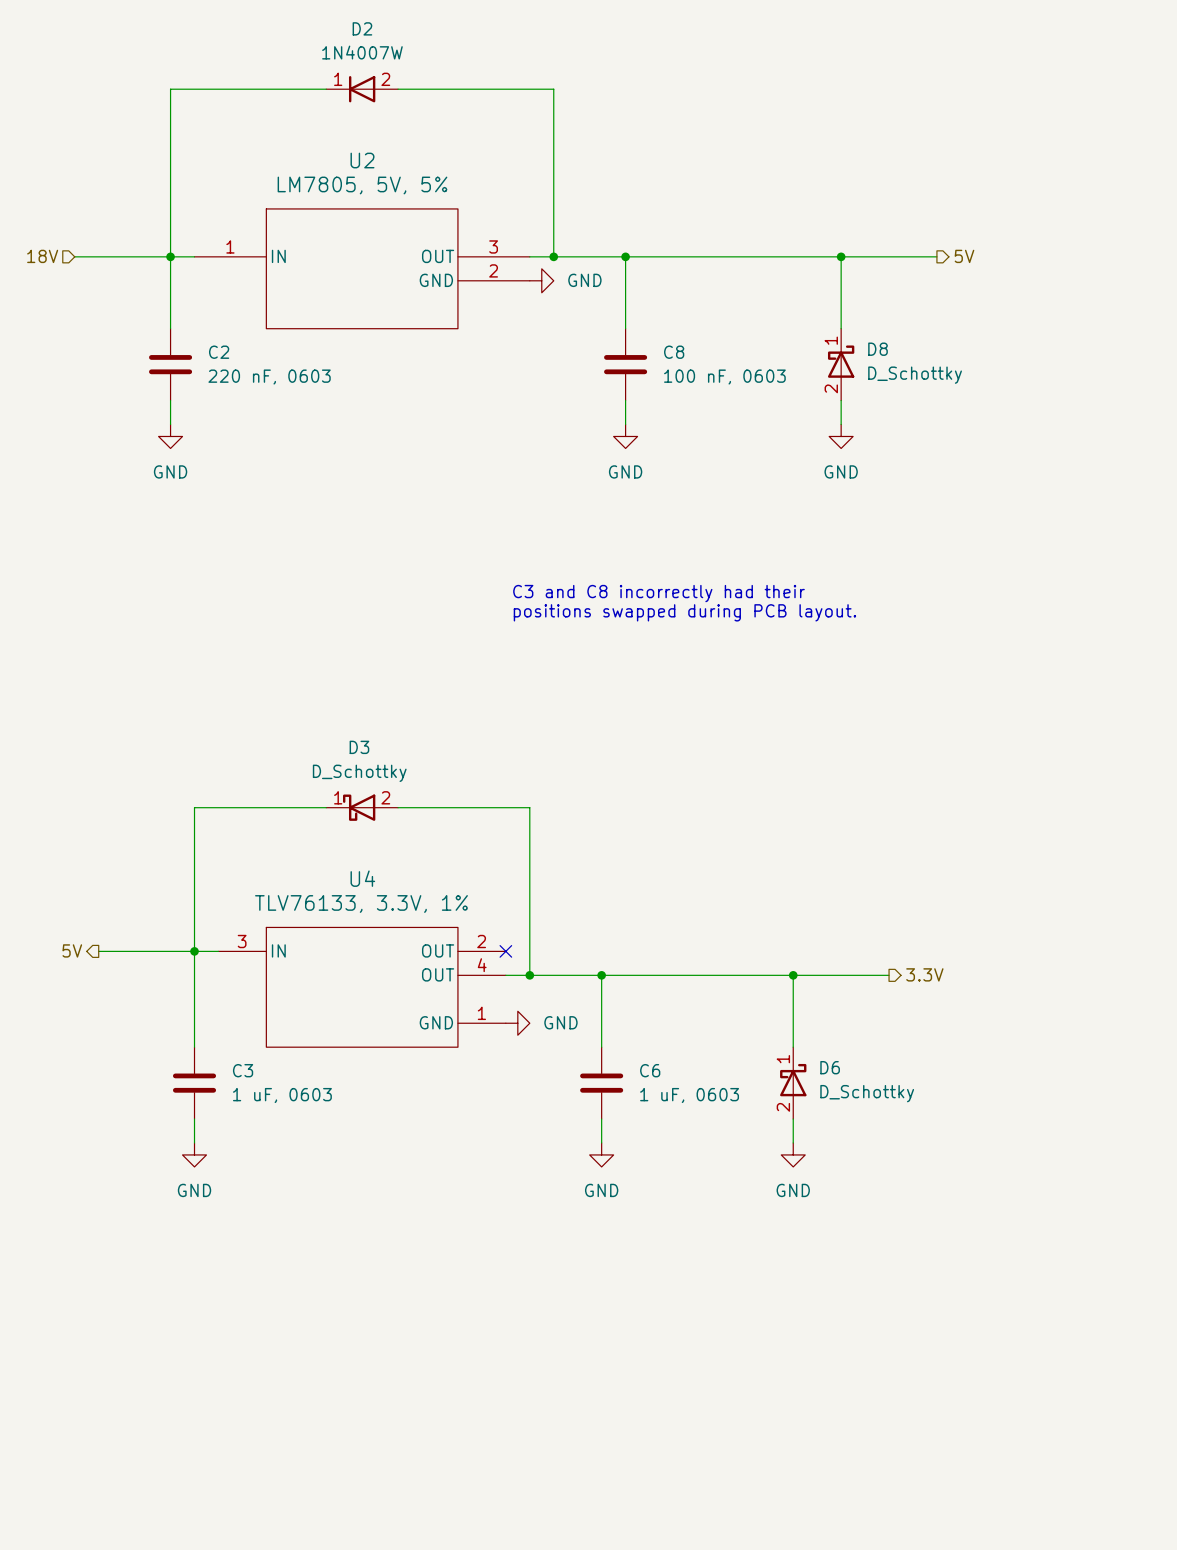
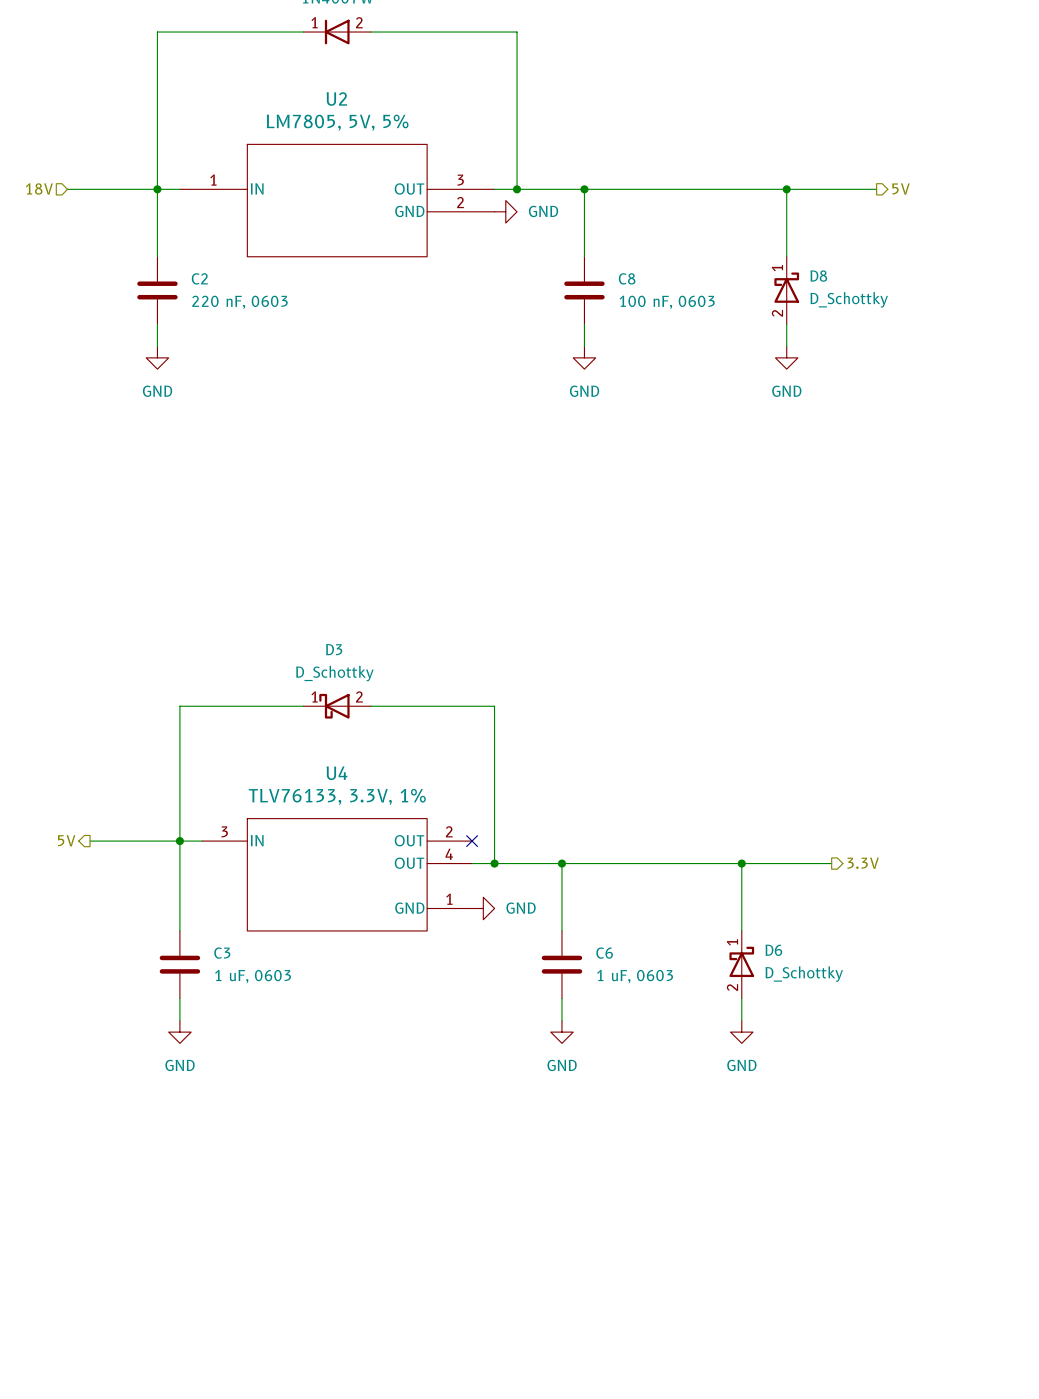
text: C3 and C8 incorrectly had their (658, 593) -> none
text: positions swapped during PCB layout. (684, 612) -> none

